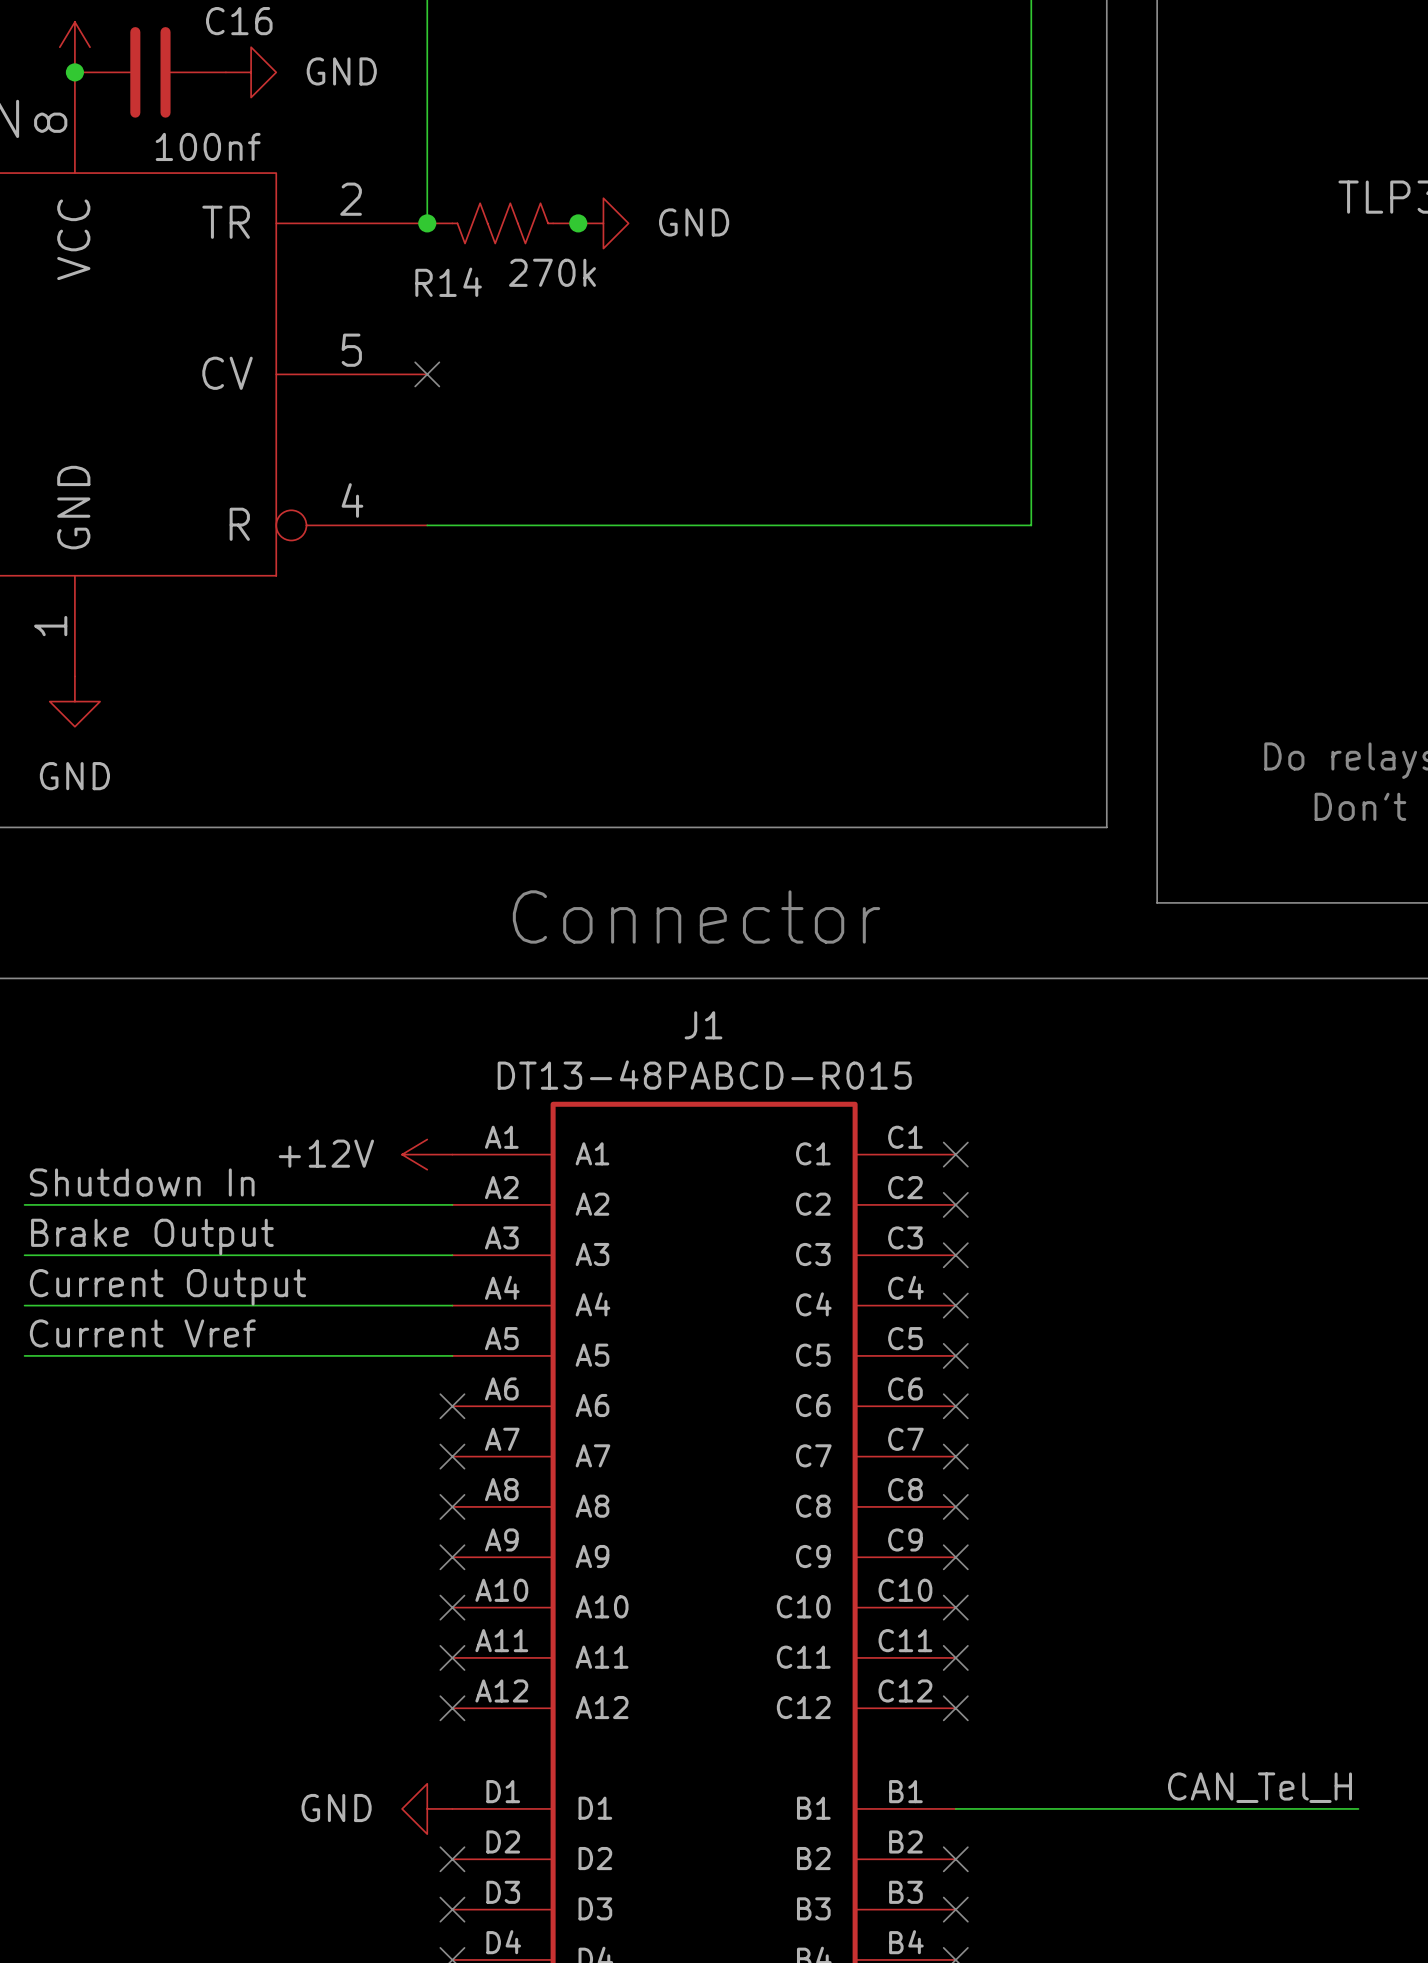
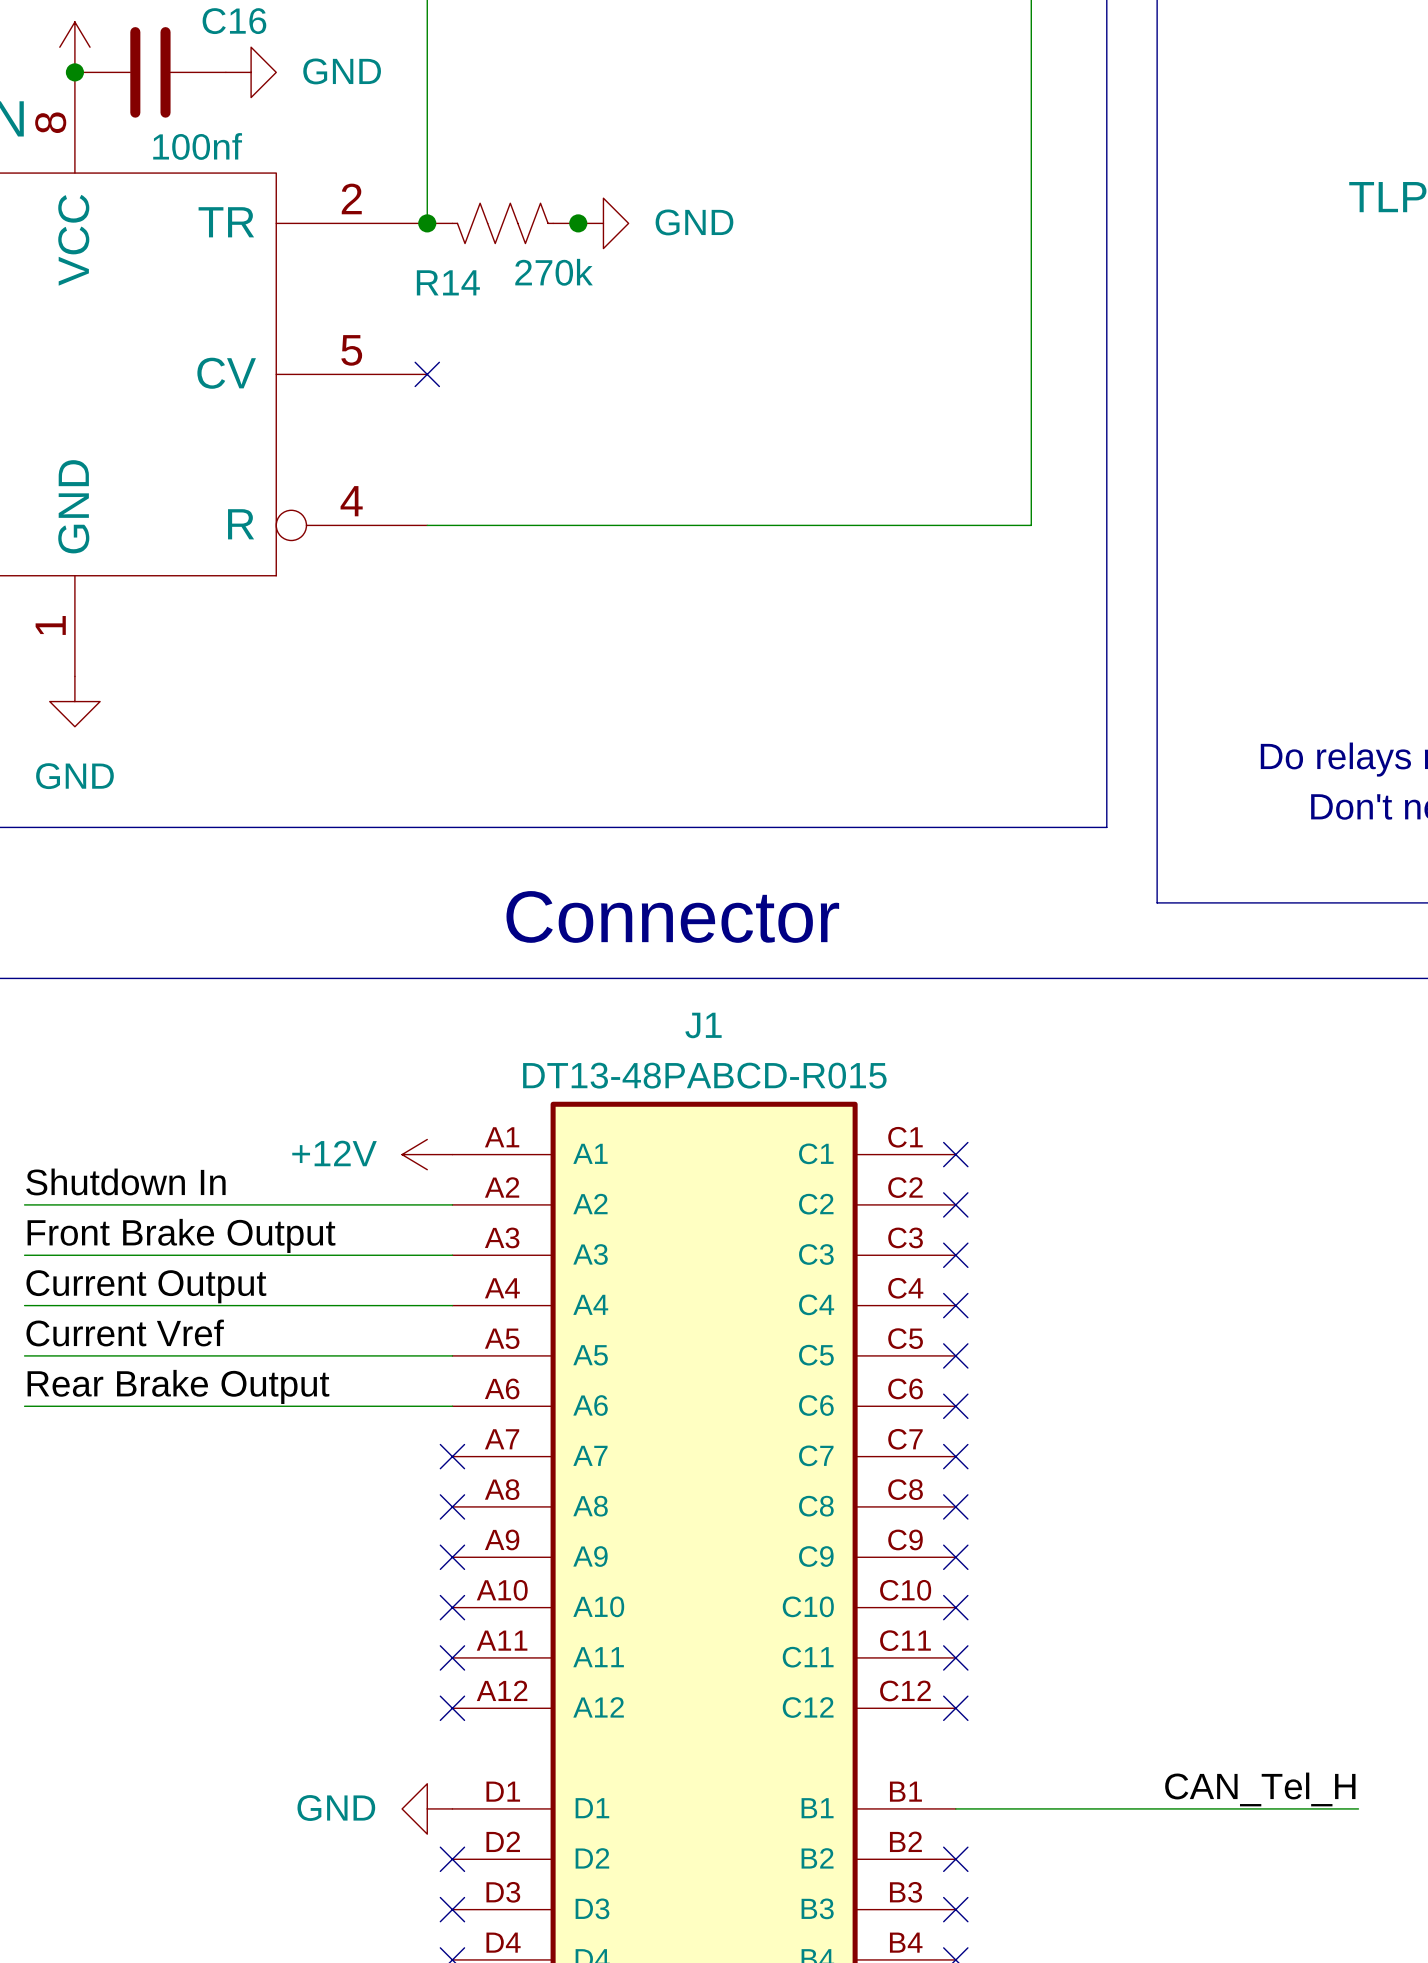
label: Brake Output (152, 1237) -> Front Brake Output (181, 1235)
label: none -> Rear Brake Output (178, 1386)
wire: none -> (24, 1406) (452, 1406)
no-connect mark: (452, 1406) -> none

